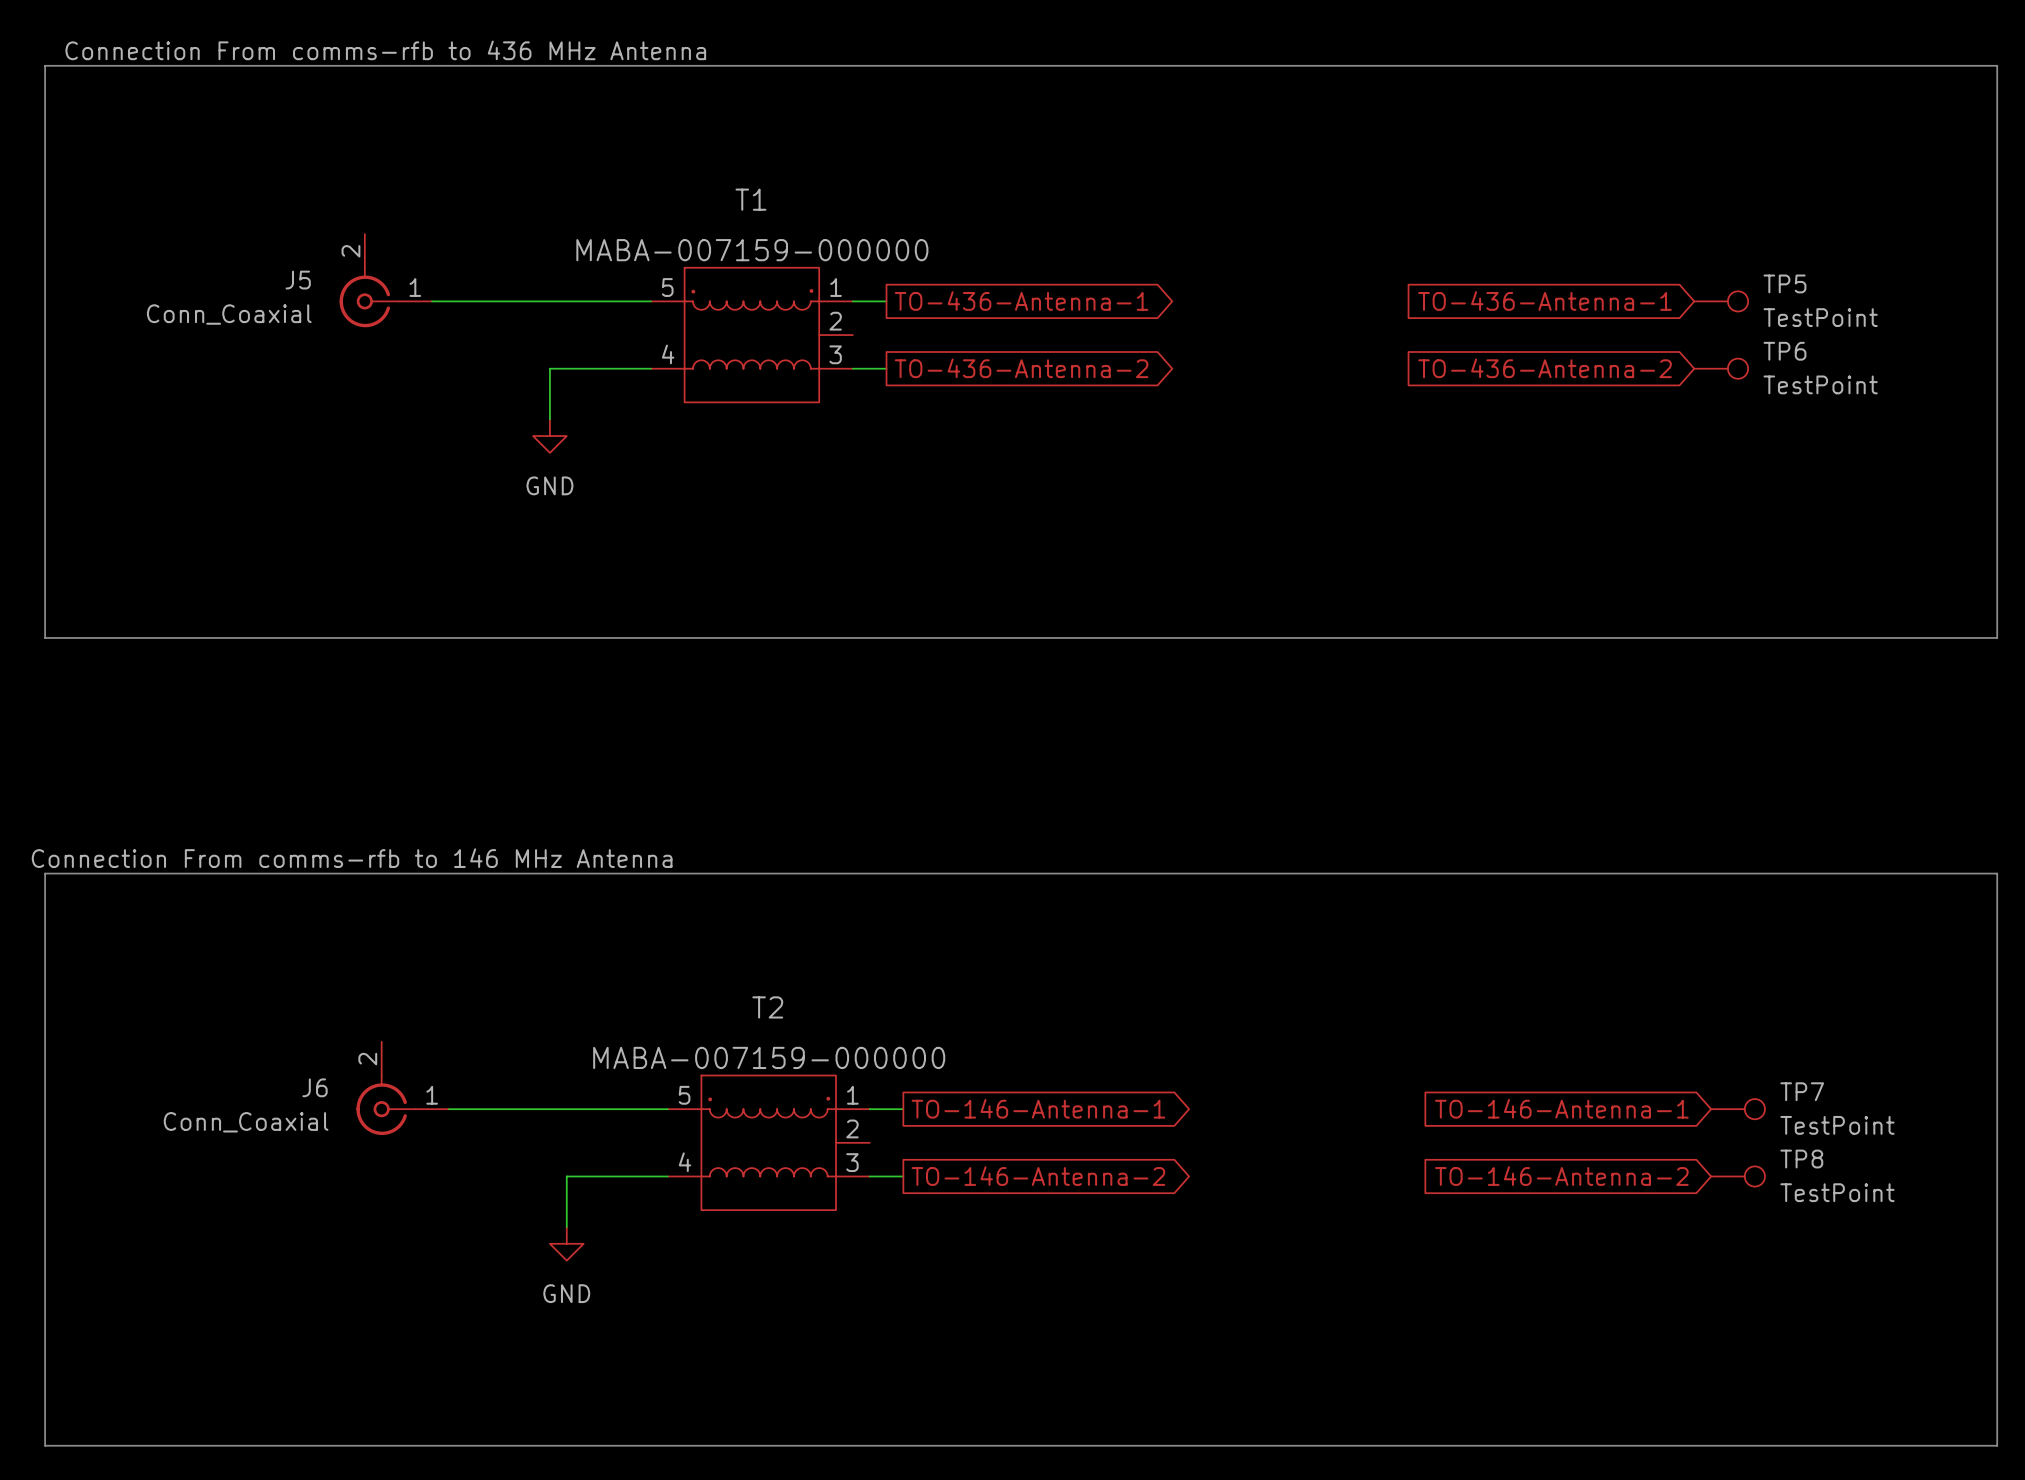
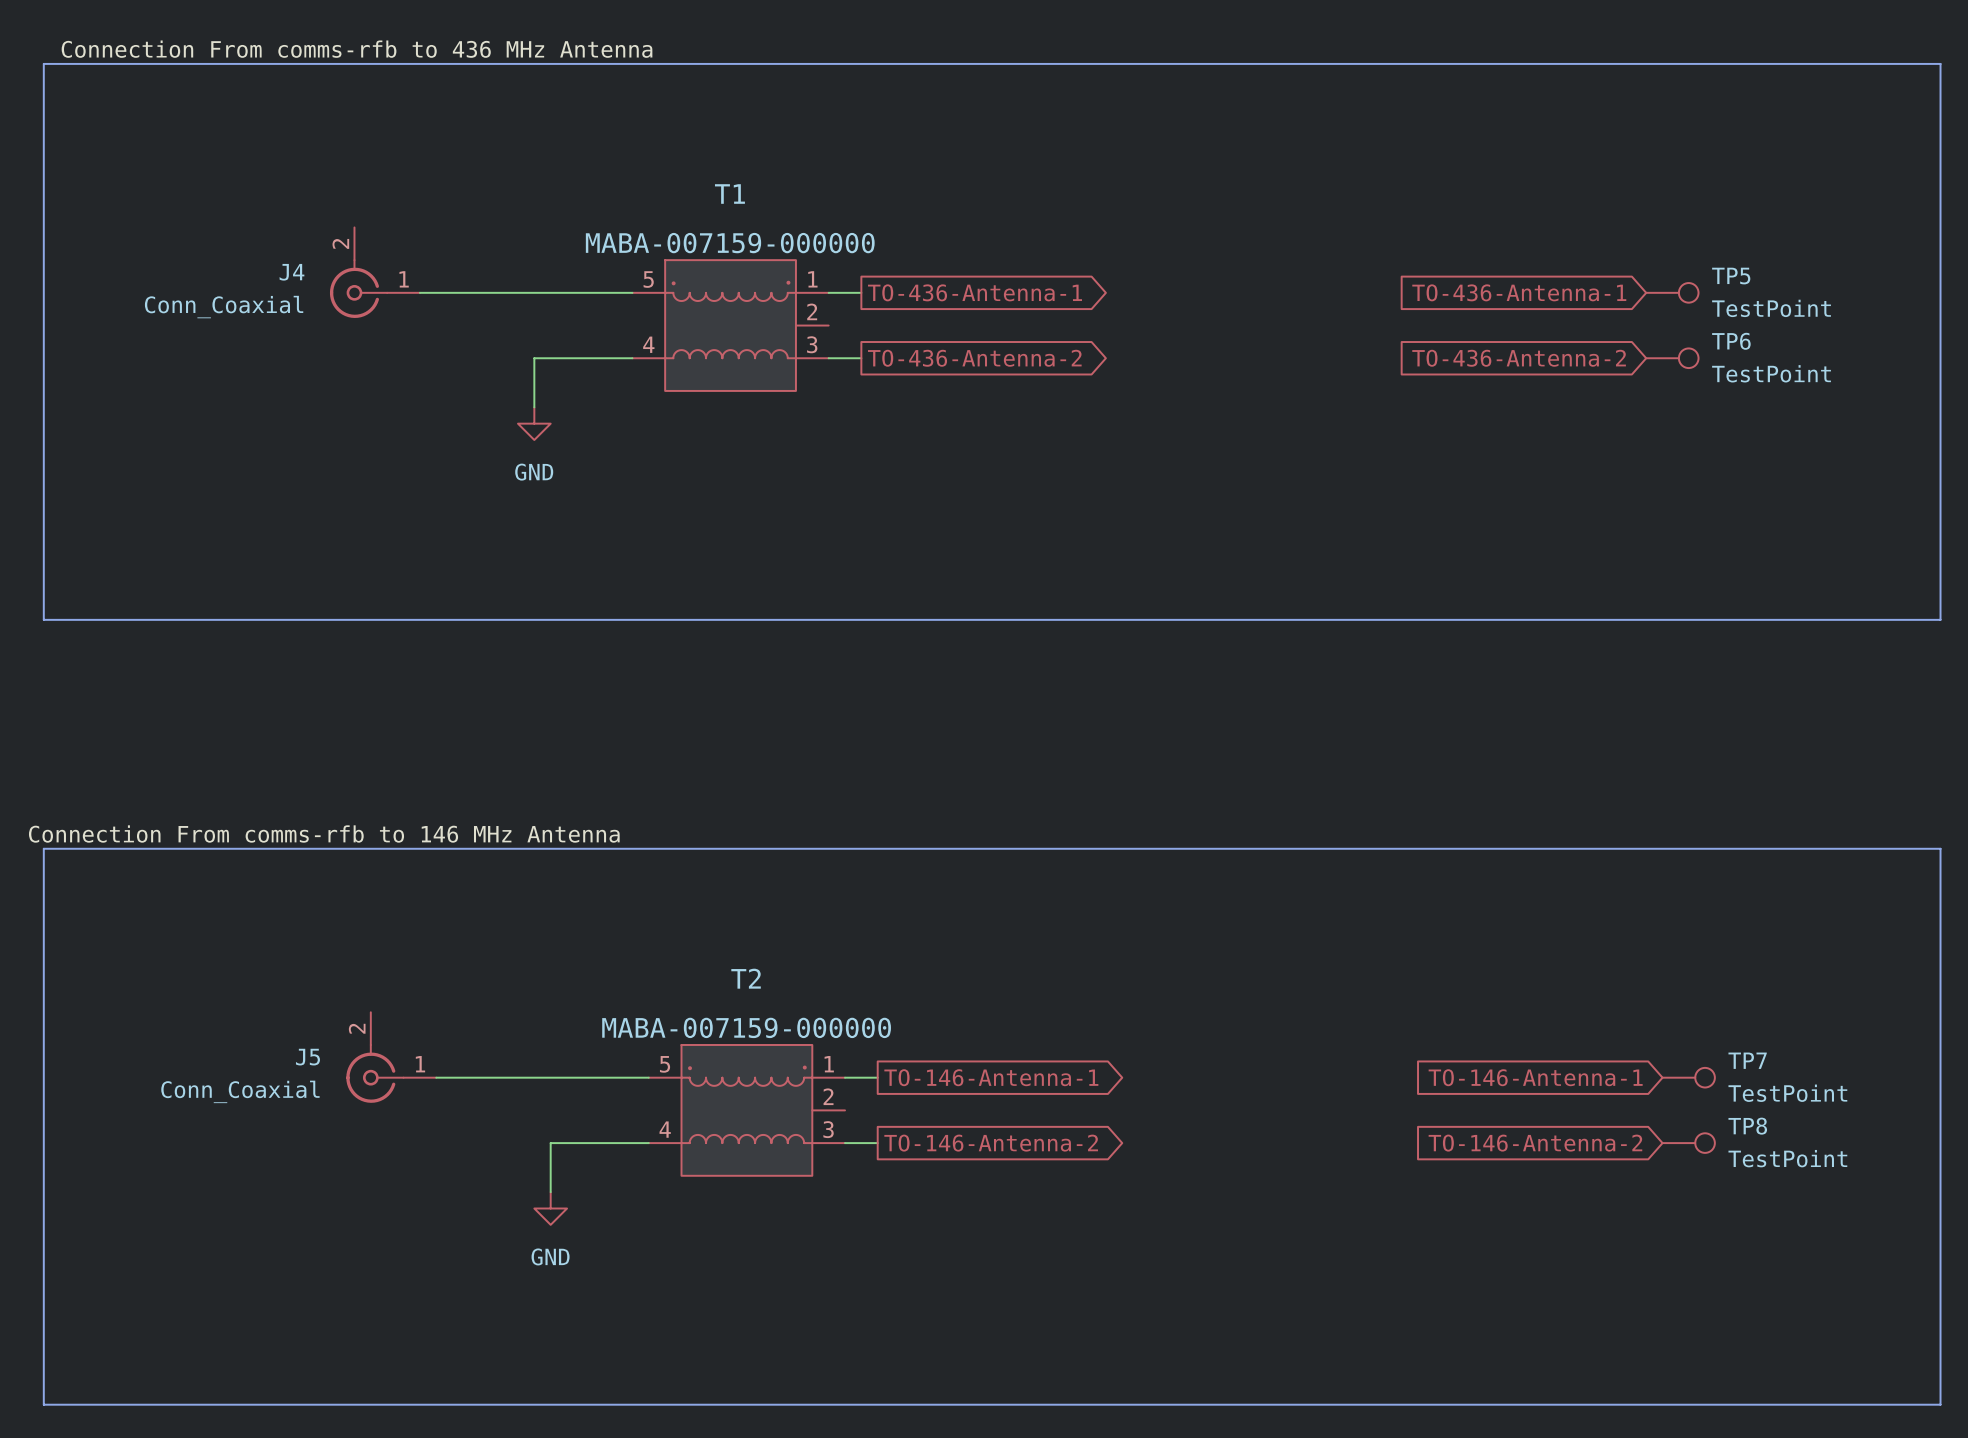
J5 name: J5 (298, 280) -> J4 (291, 272)
J6 name: J6 (315, 1087) -> J5 (307, 1057)

